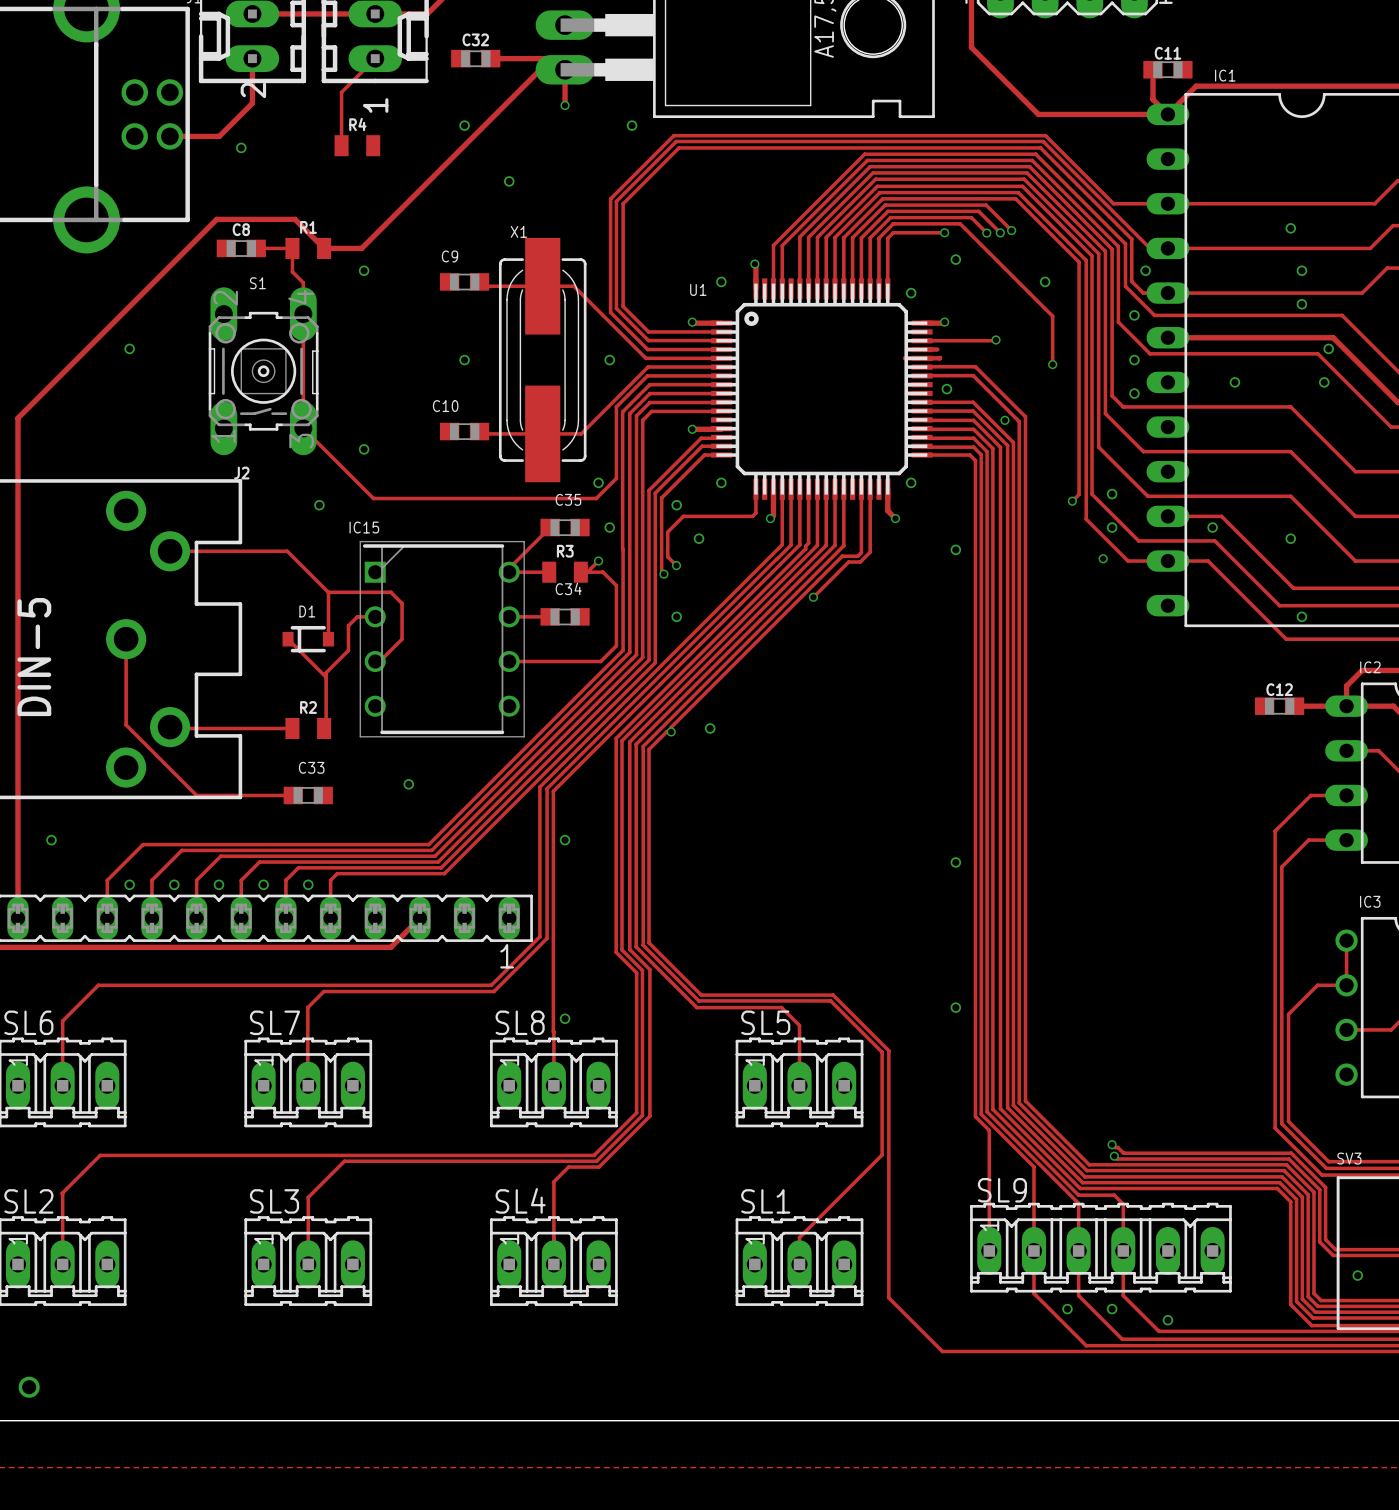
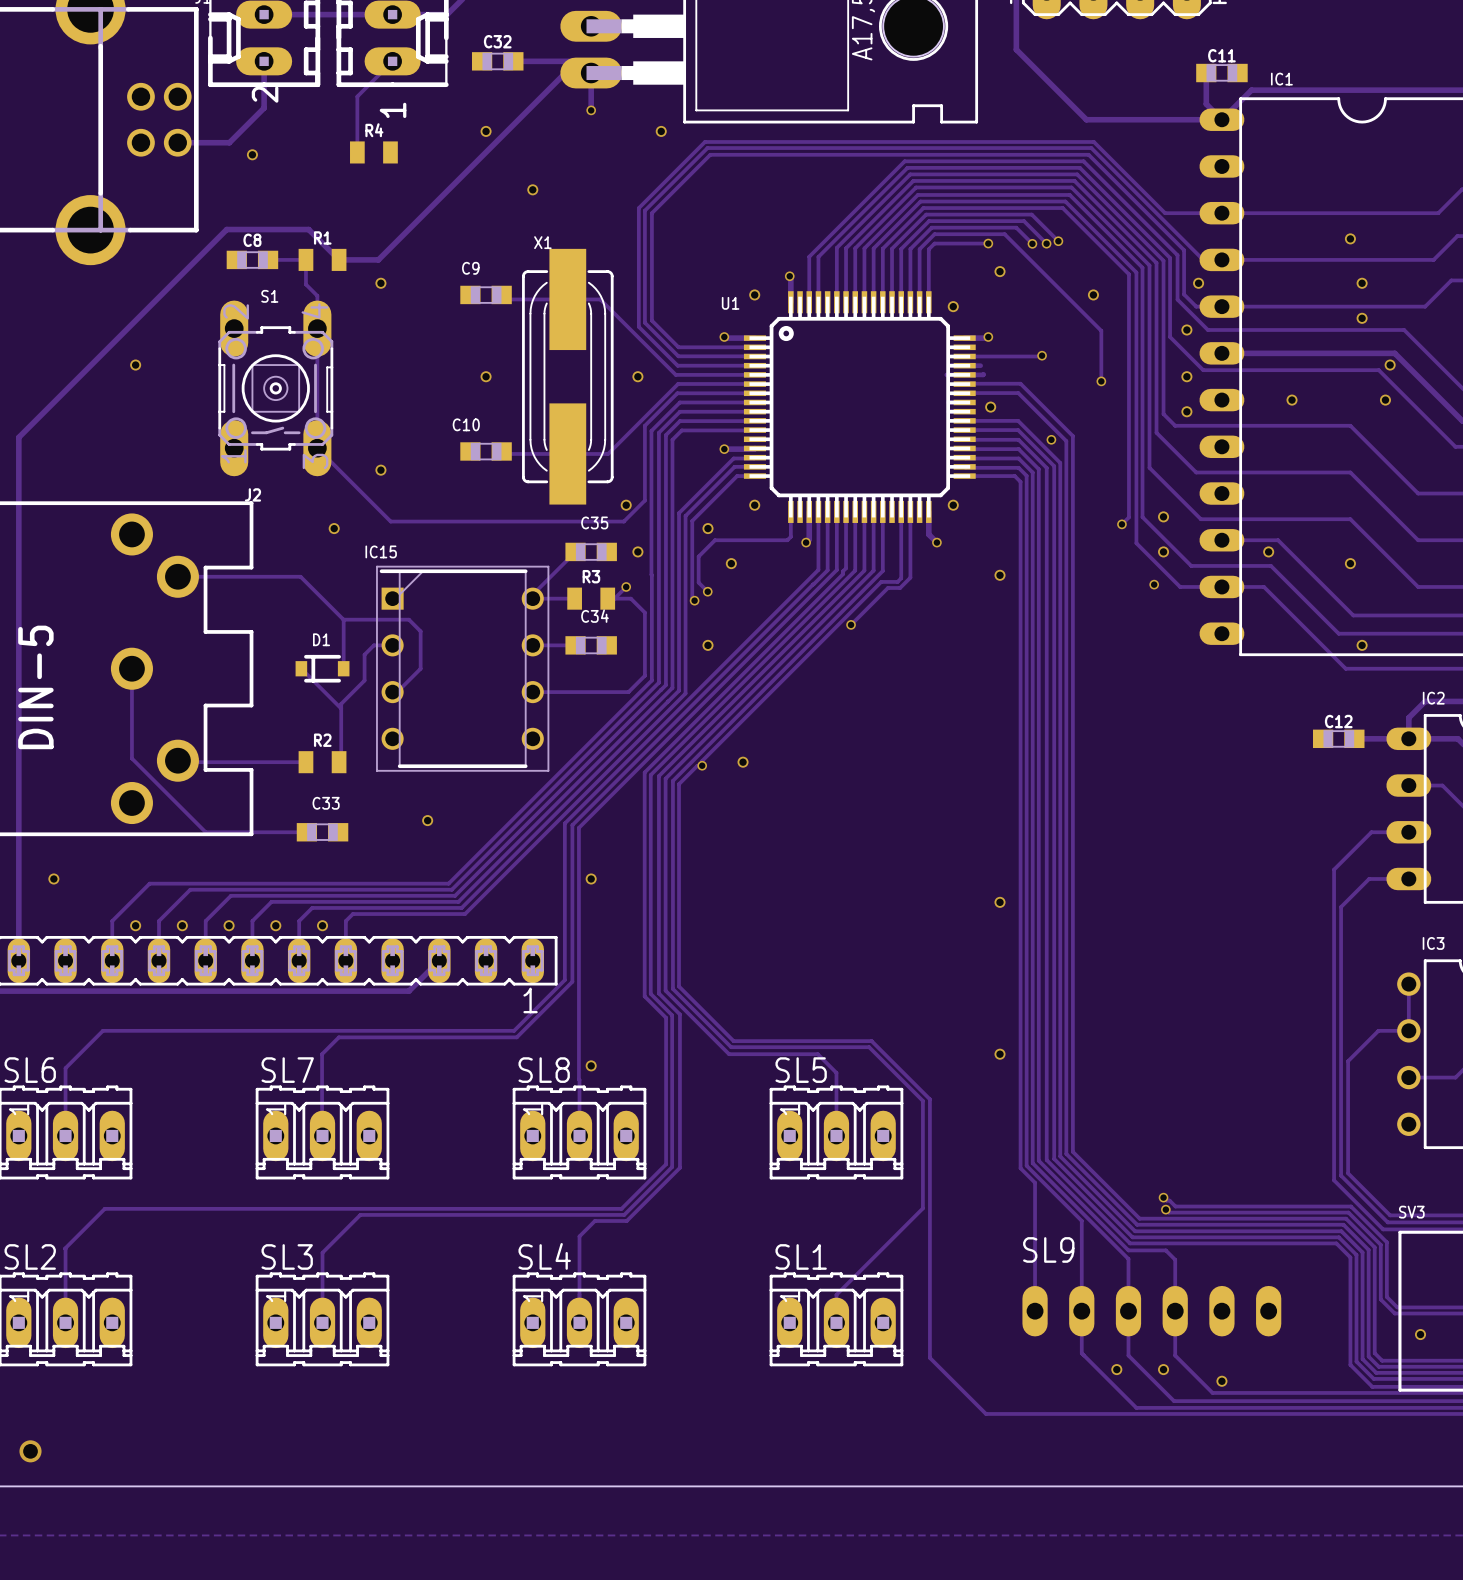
SL9 side: top (1100, 1247) -> bottom (1151, 1311)

